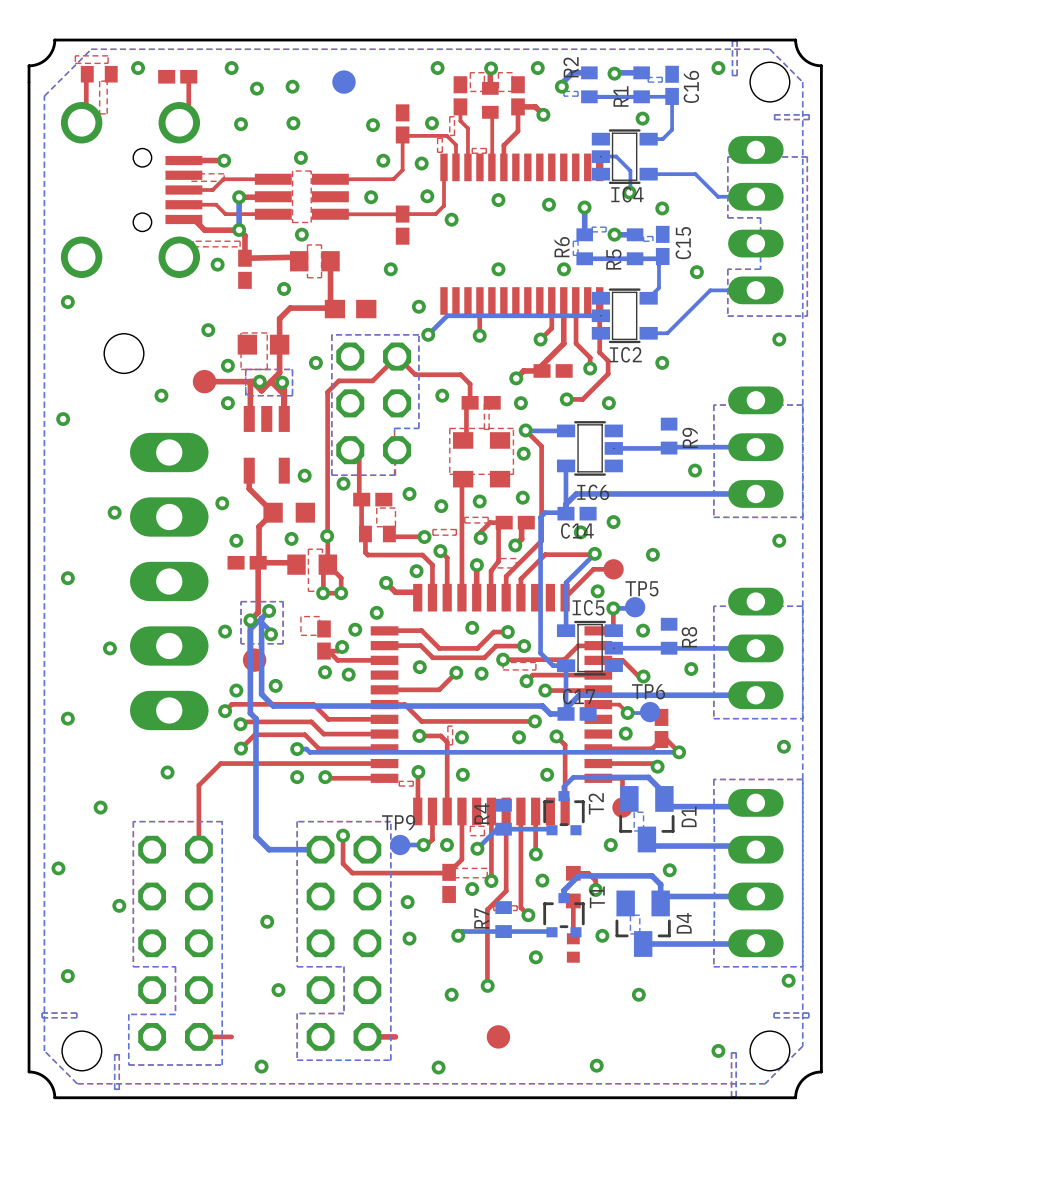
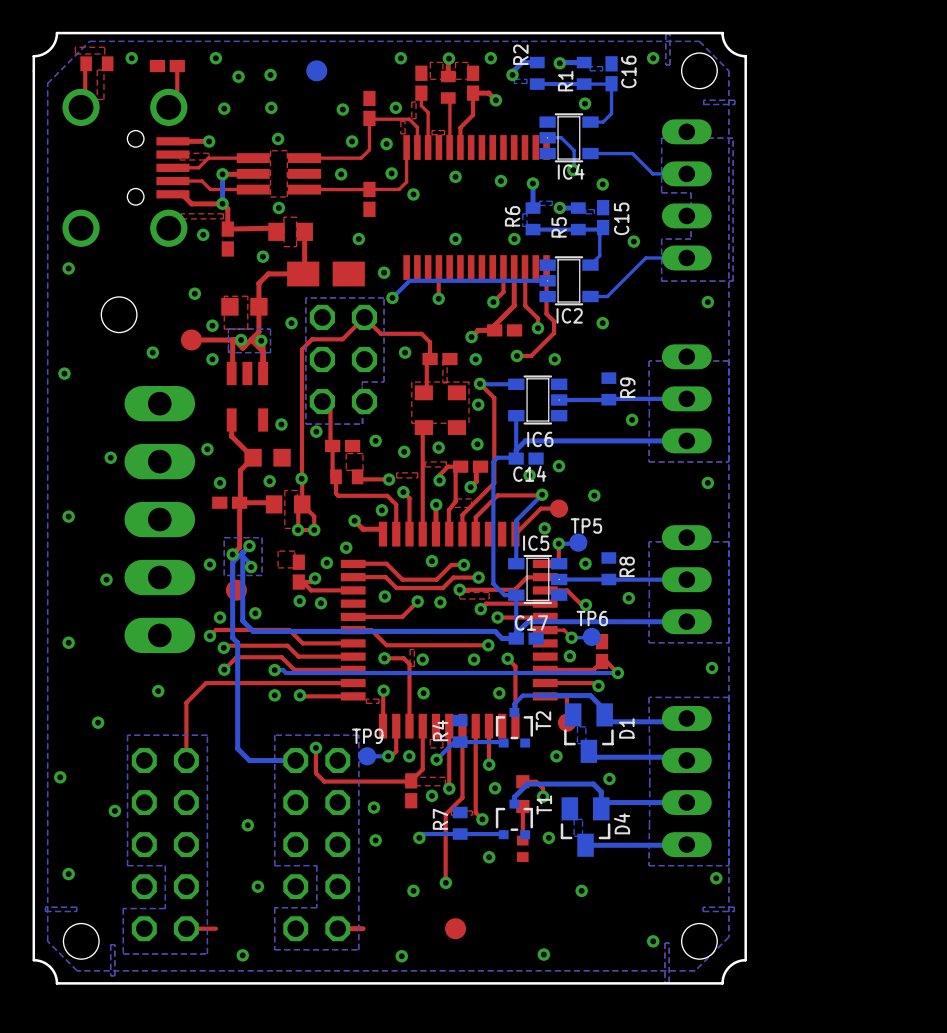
part footprint: [324, 299, 377, 319] -> [287, 261, 365, 287]

